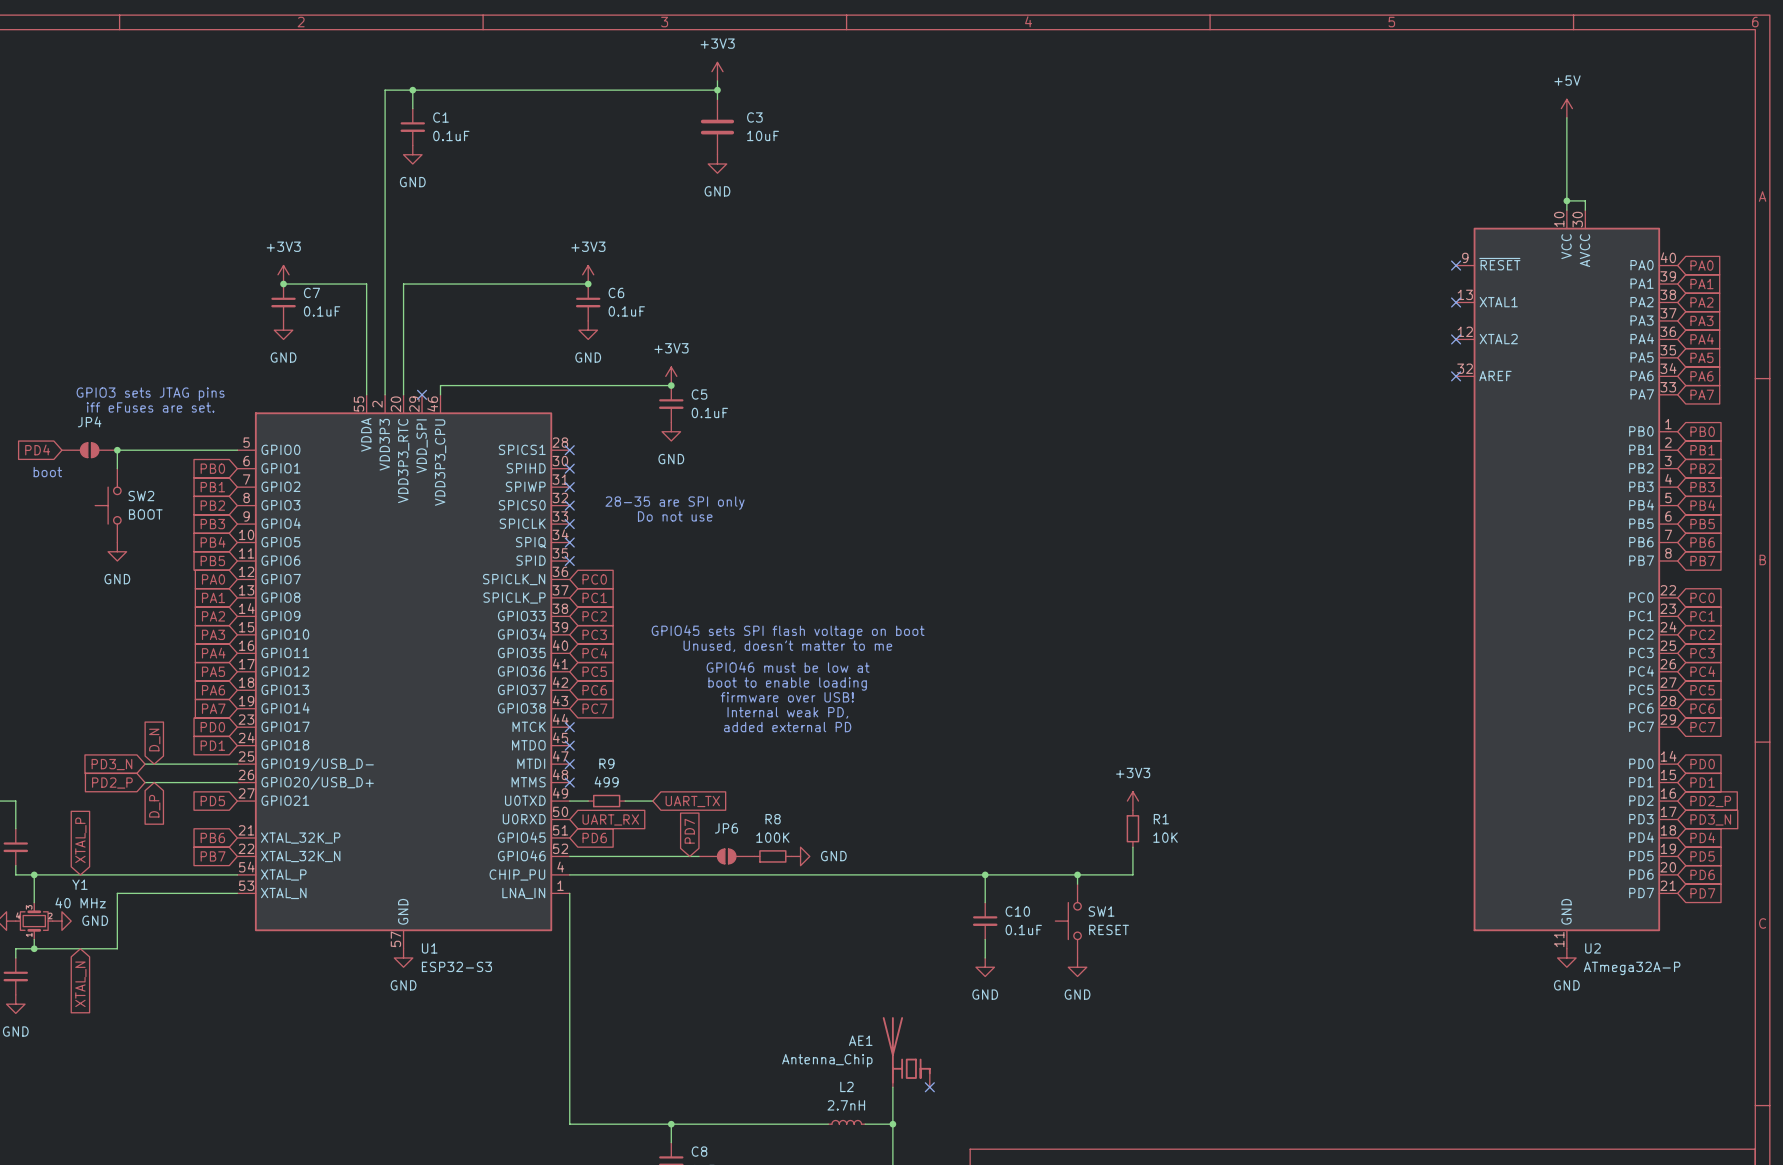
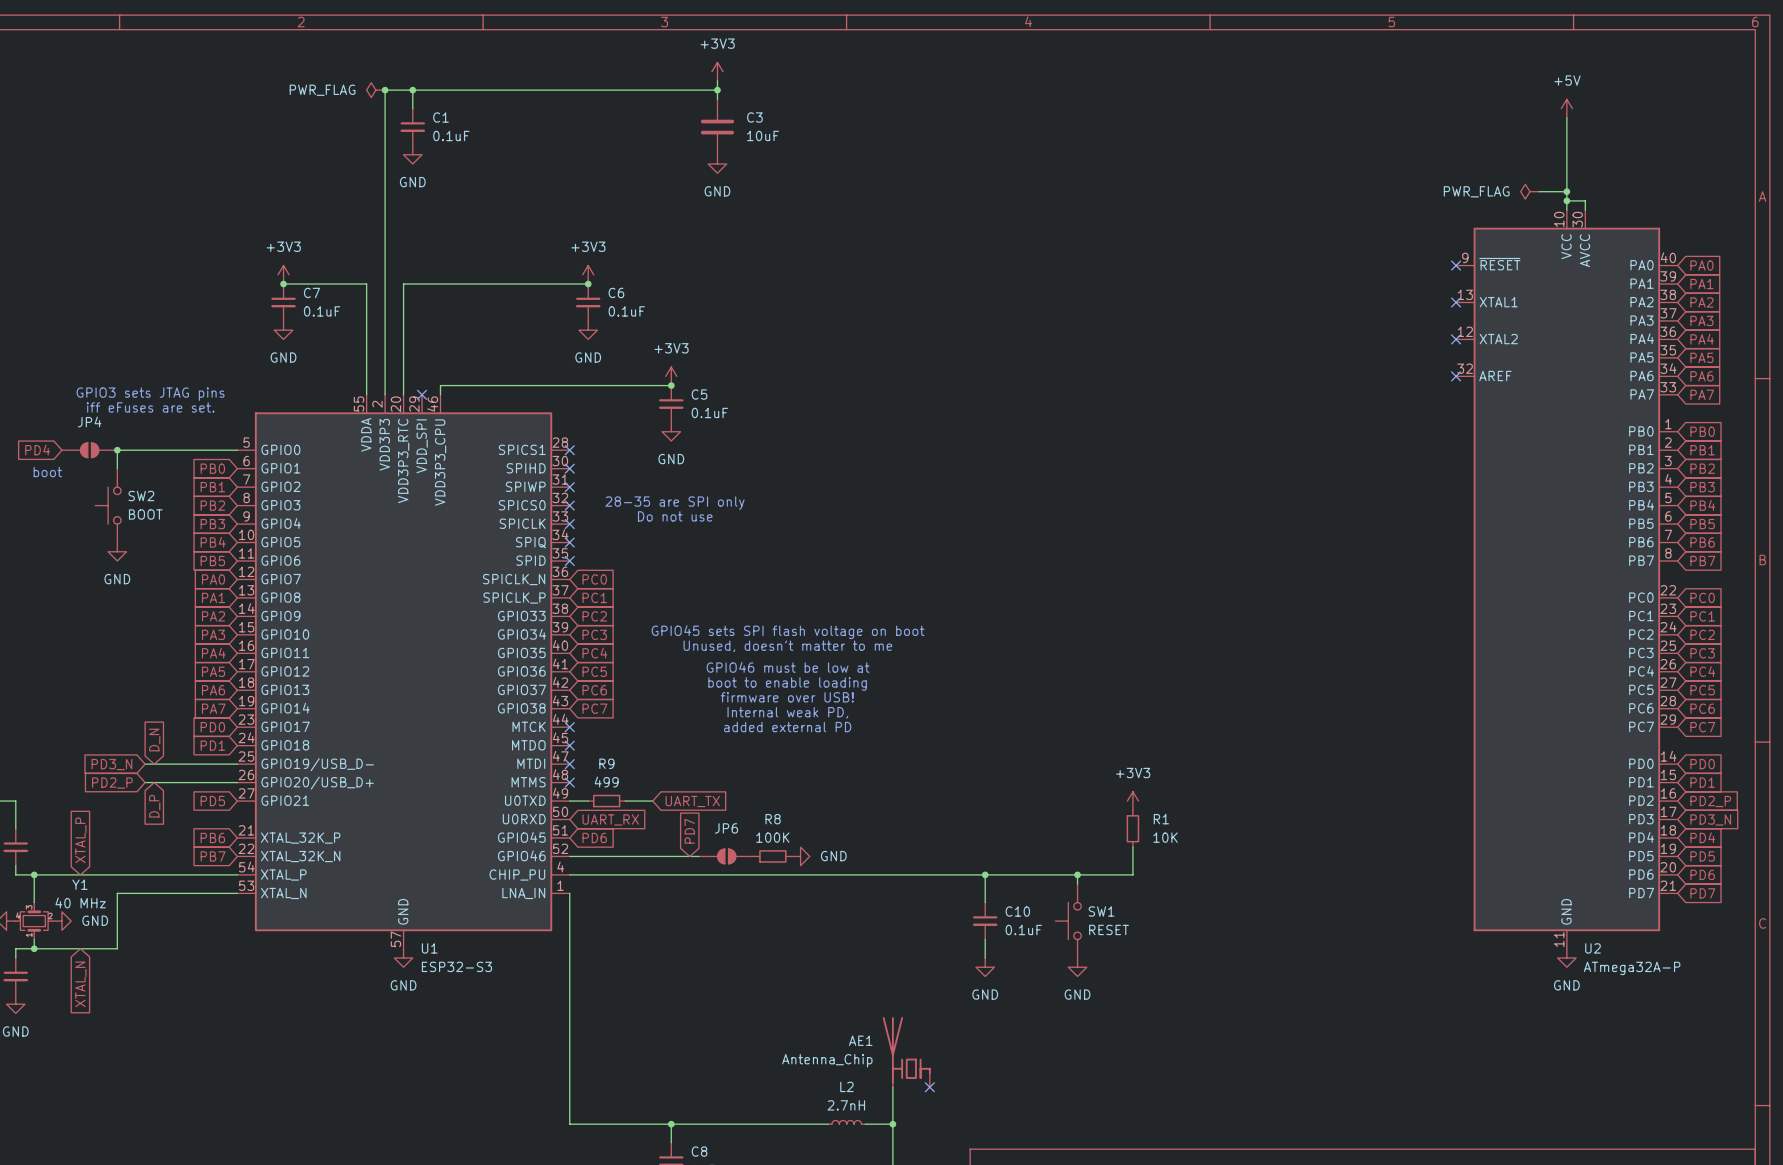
power symbol: none -> PWR_FLAG (375, 90)
junction: none -> (385, 90)
power symbol: none -> PWR_FLAG (1529, 191)
wire: none -> (1539, 191) (1566, 191)
junction: none -> (1566, 191)

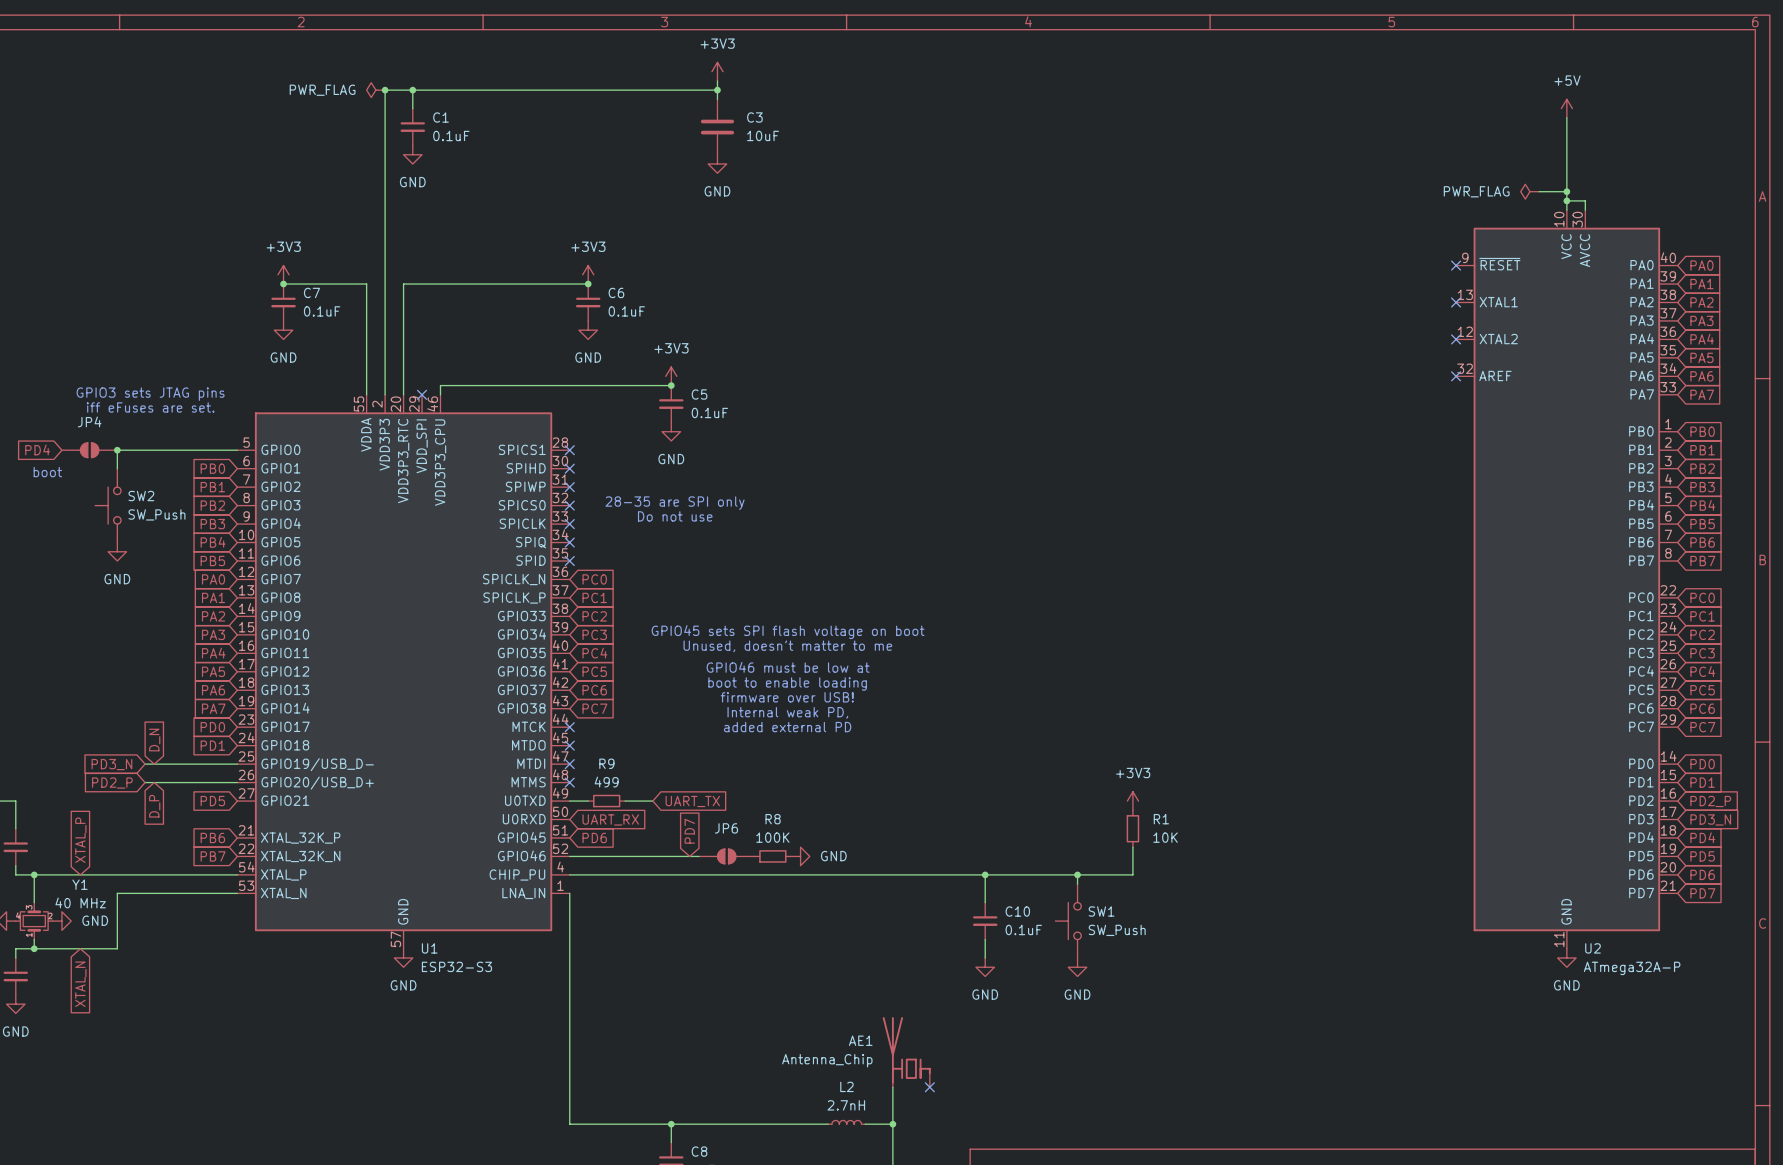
SW2 value: BOOT (145, 514) -> SW_Push (156, 514)
SW1 value: RESET (1109, 929) -> SW_Push (1117, 930)

